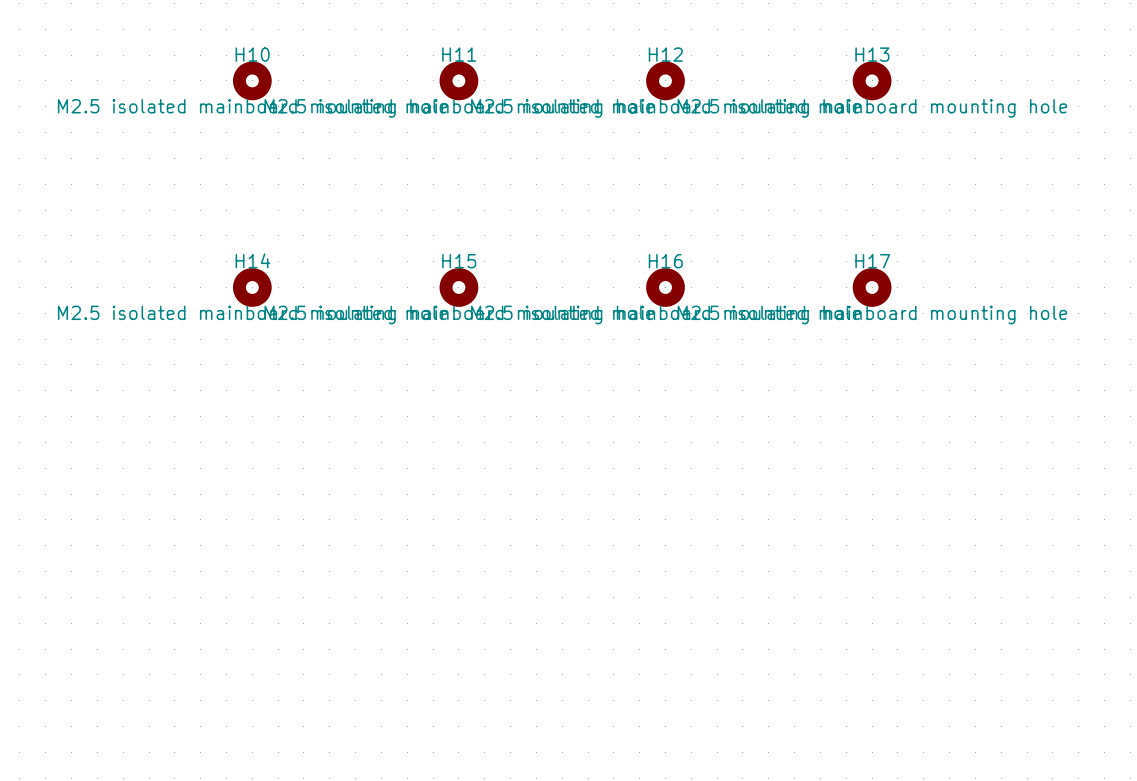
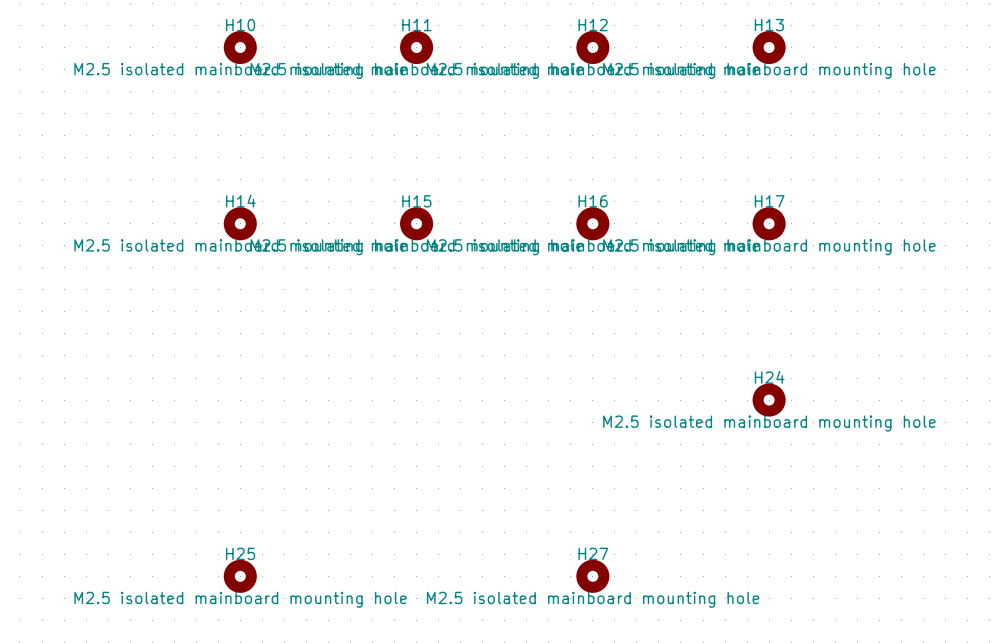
H24: none -> M2.5 isolated mainboard mounting hole (769, 400)
H25: none -> M2.5 isolated mainboard mounting hole (240, 576)
H27: none -> M2.5 isolated mainboard mounting hole (592, 576)

